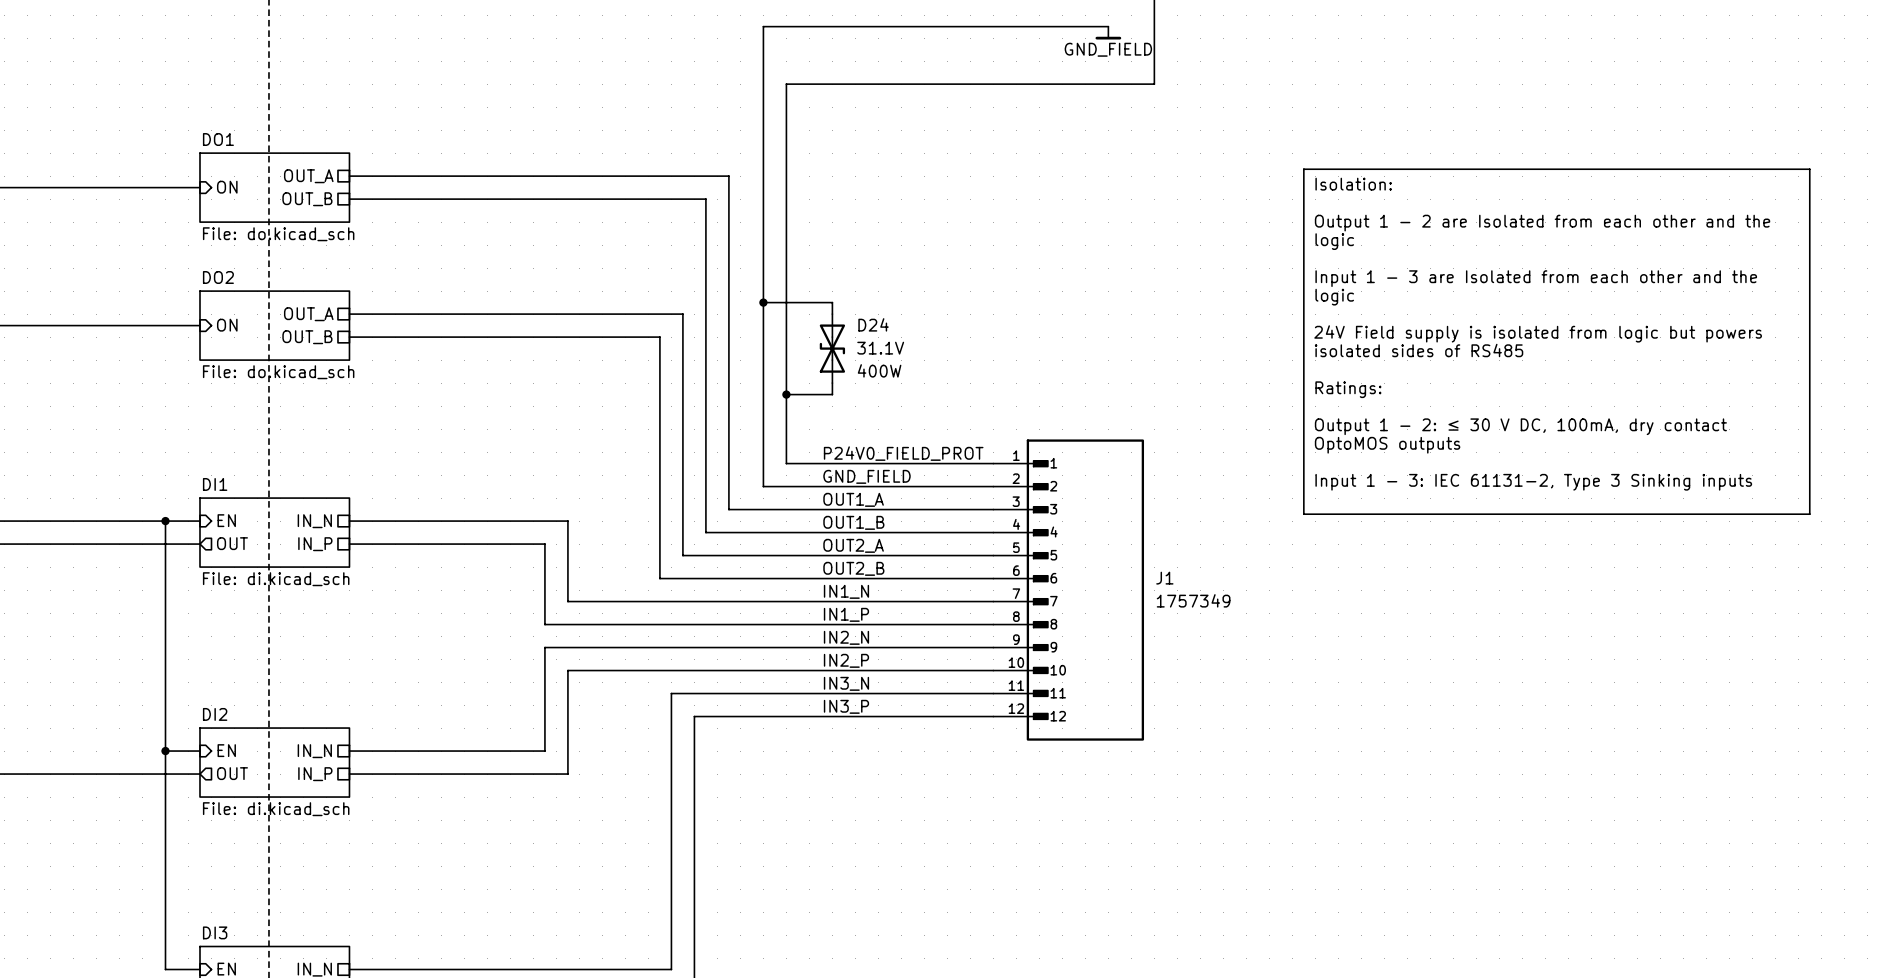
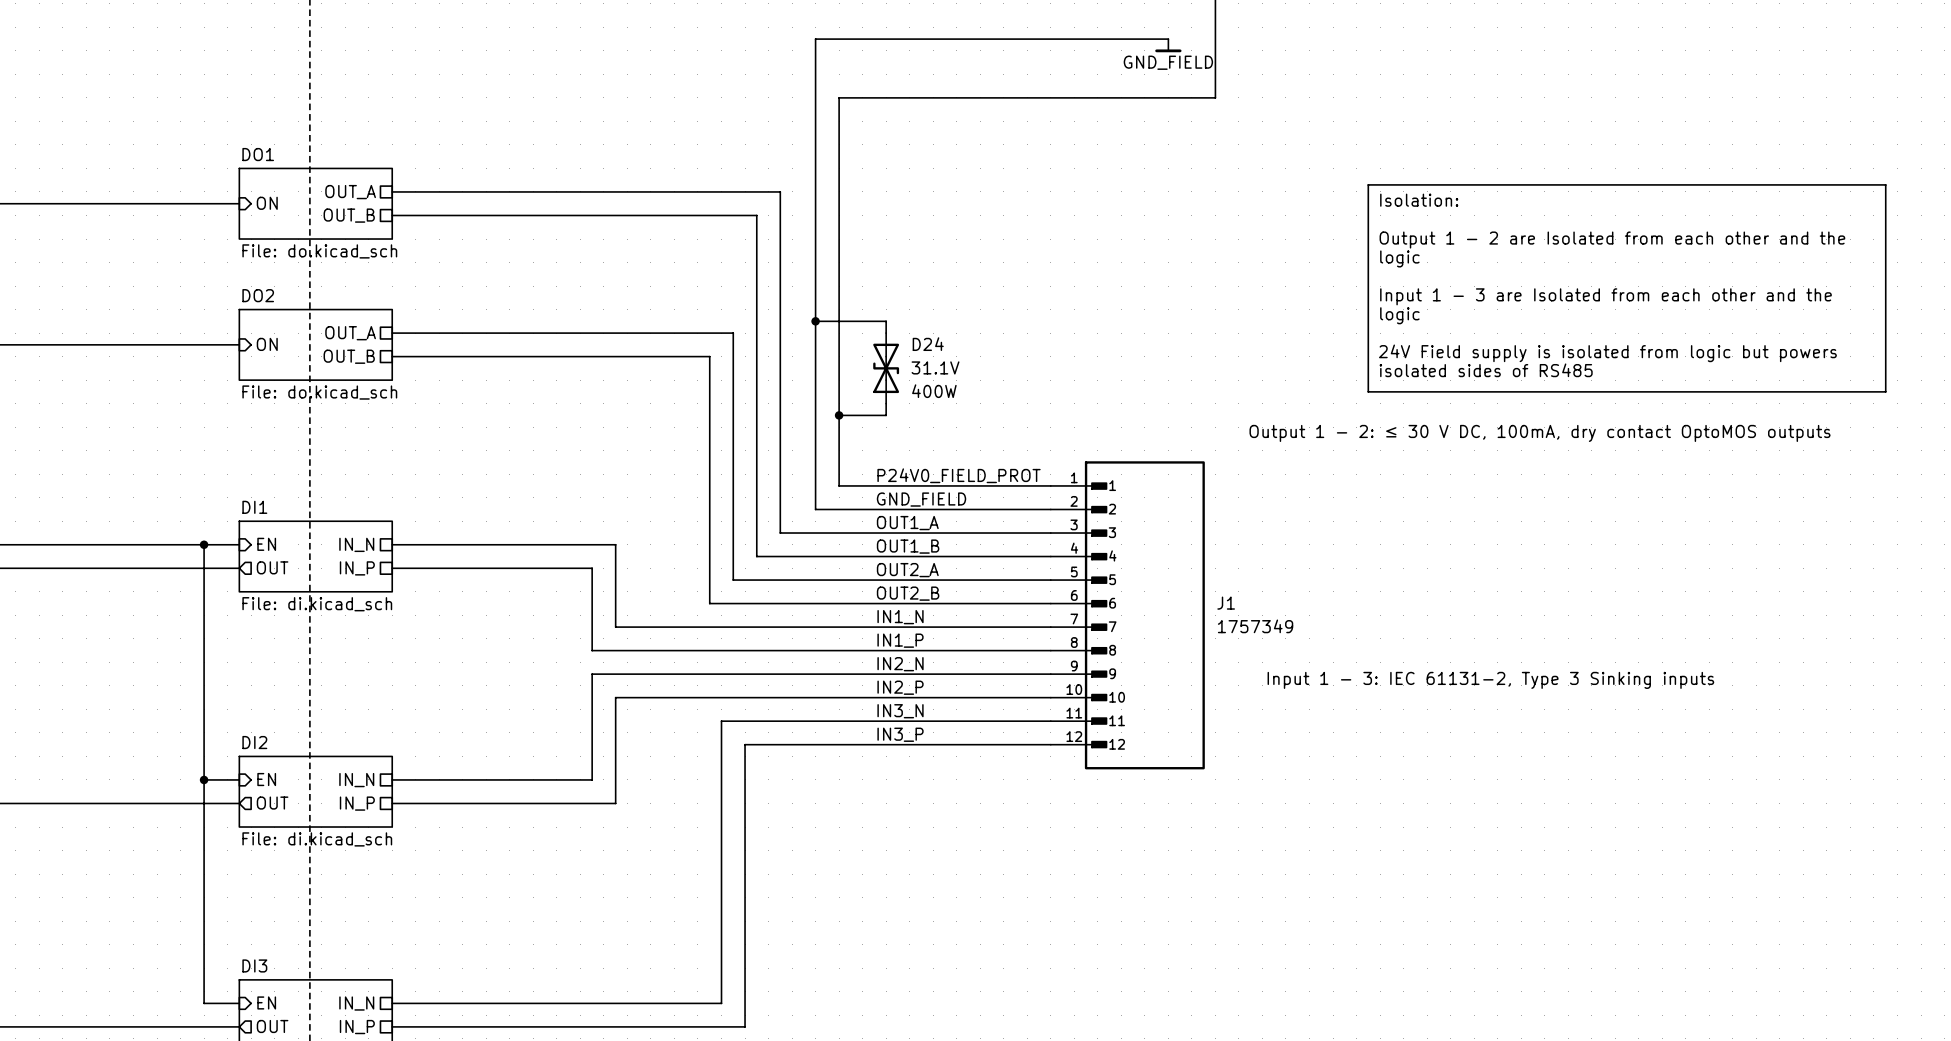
line: (1303, 371) (1303, 514) (1809, 514) (1809, 371) -> (1368, 391) (1885, 391)
text: Ratings: (1348, 389) -> none
text: Output 1 - 2: ≤ 30 V DC, 100mA, dry contact (1520, 426) -> Output 1 - 2: ≤ 30 V DC, 100mA, dry contact OptoMOS outputs (1539, 433)
text: OptoMOS outputs (1387, 445) -> none
text position: Input 1 - 3: IEC 61131-2, Type 3 Sinking inputs (1533, 482) -> Input 1 - 3: IEC 61131-2, Type 3 Sinking inputs (1490, 680)

